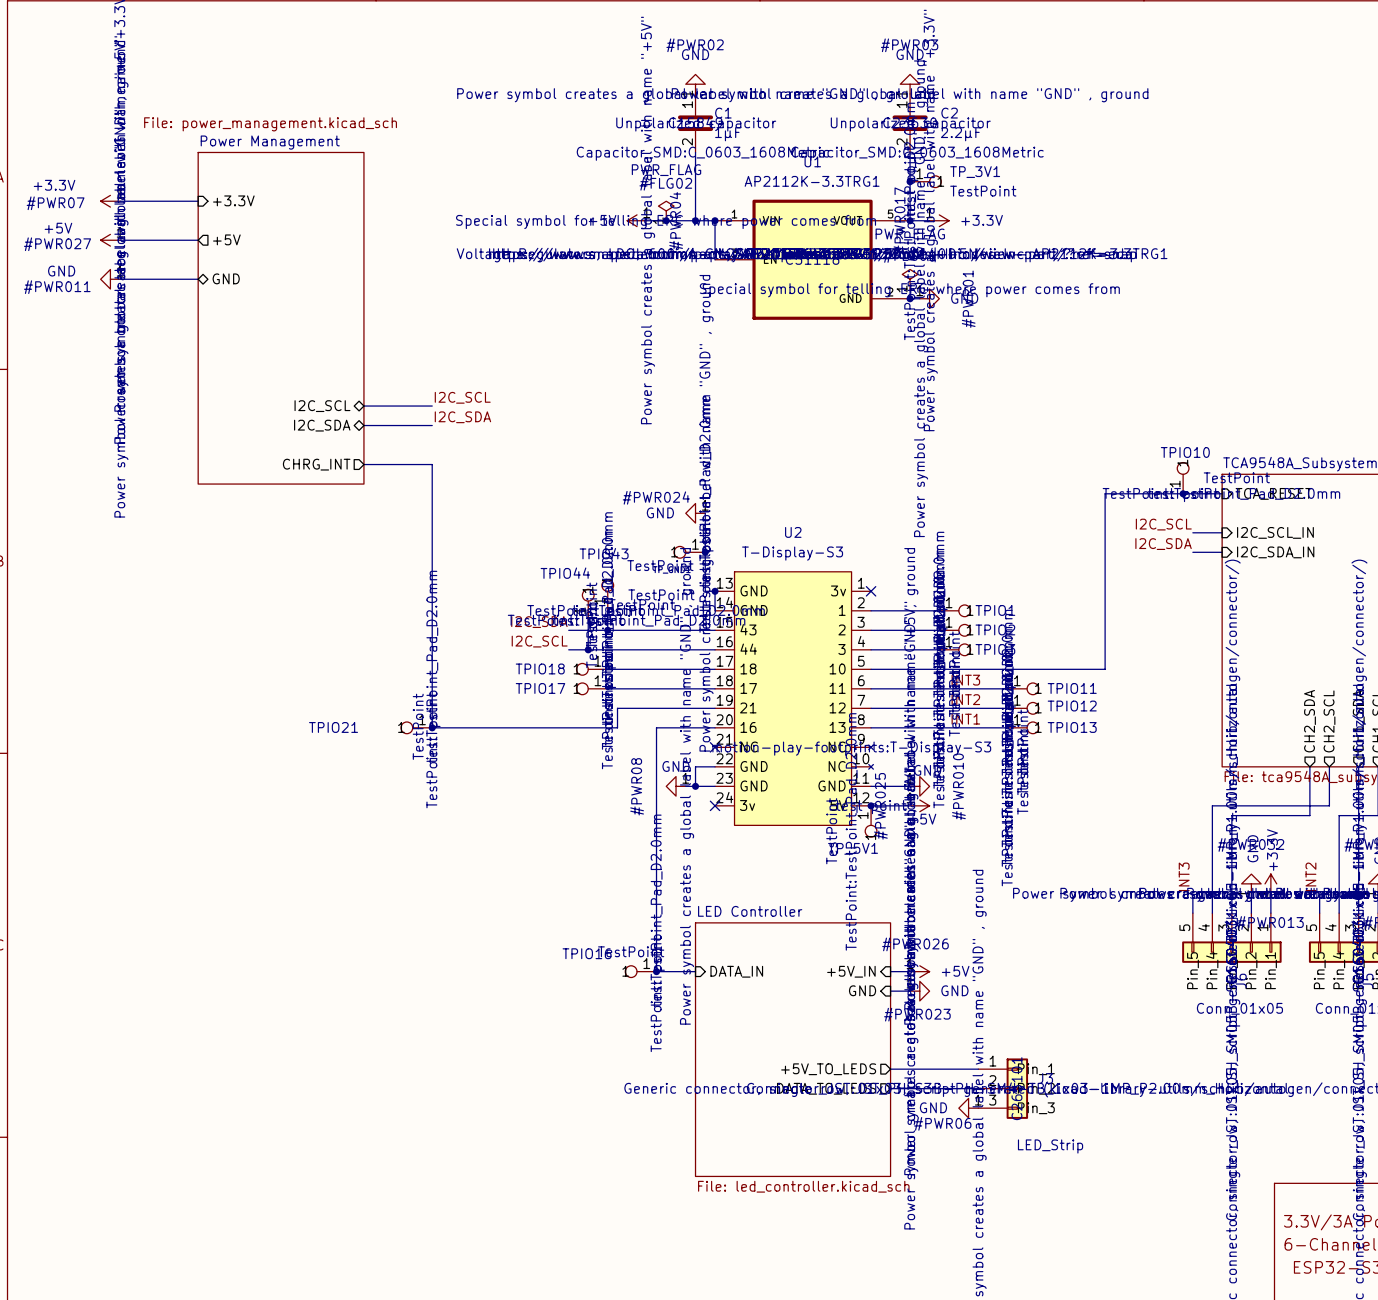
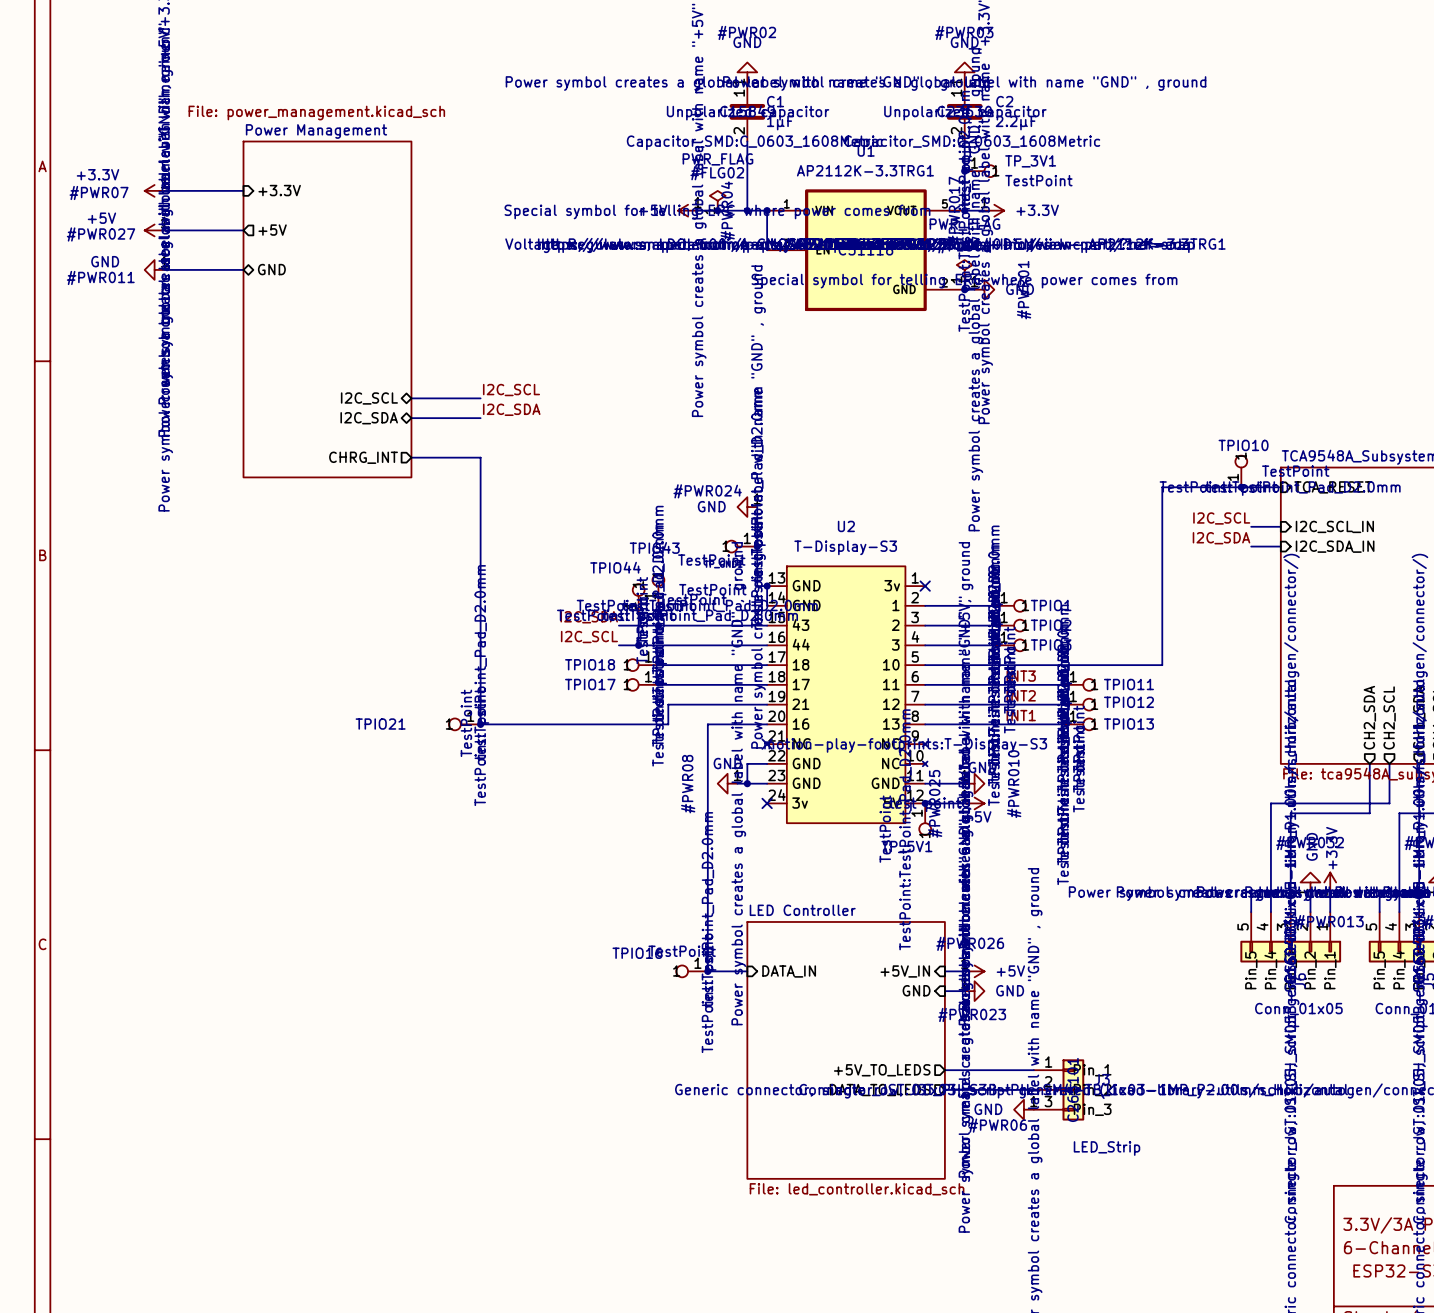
label: INT3 (1184, 876) -> none
label: INT2 (1310, 876) -> none

